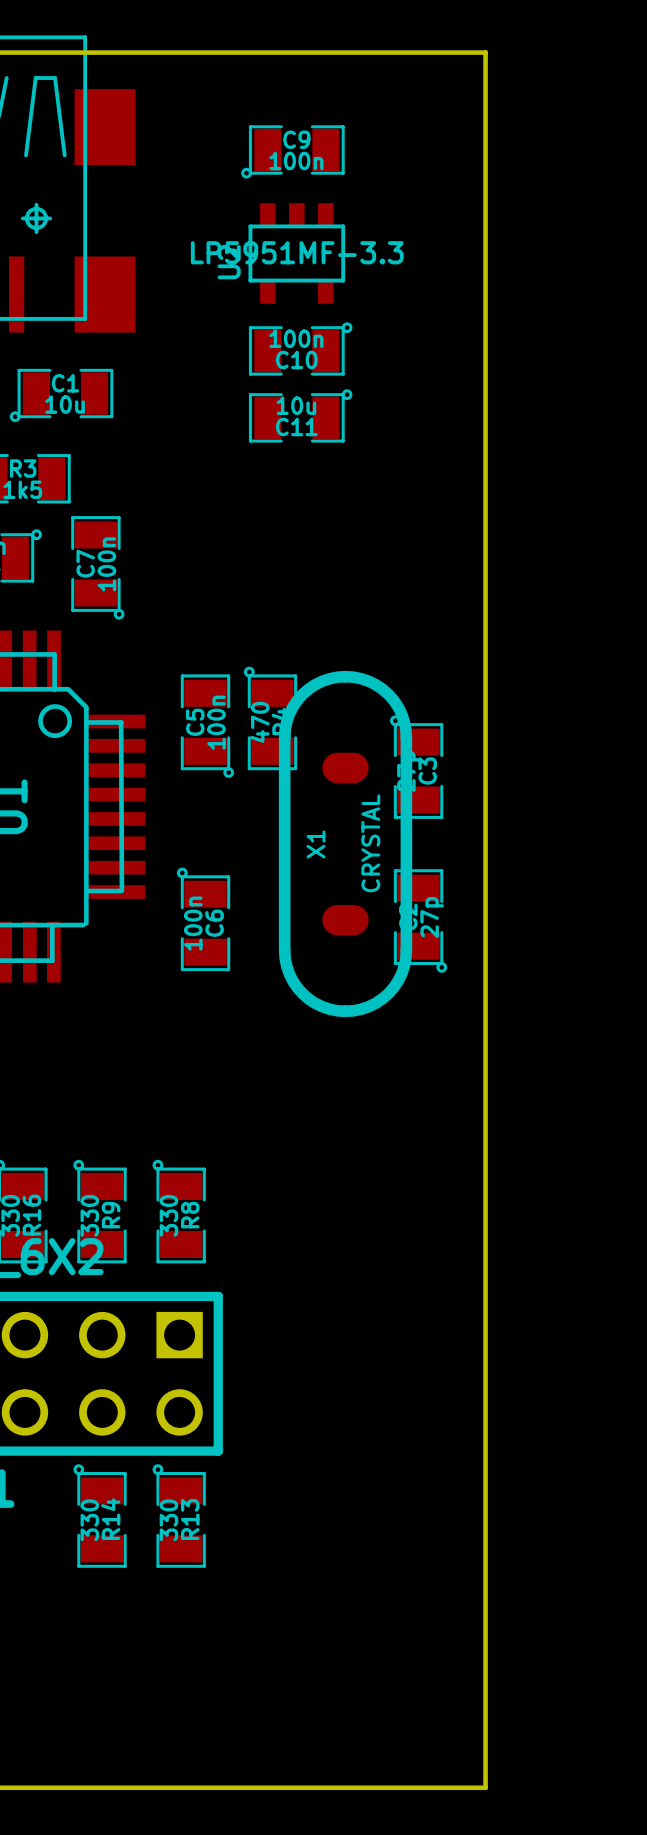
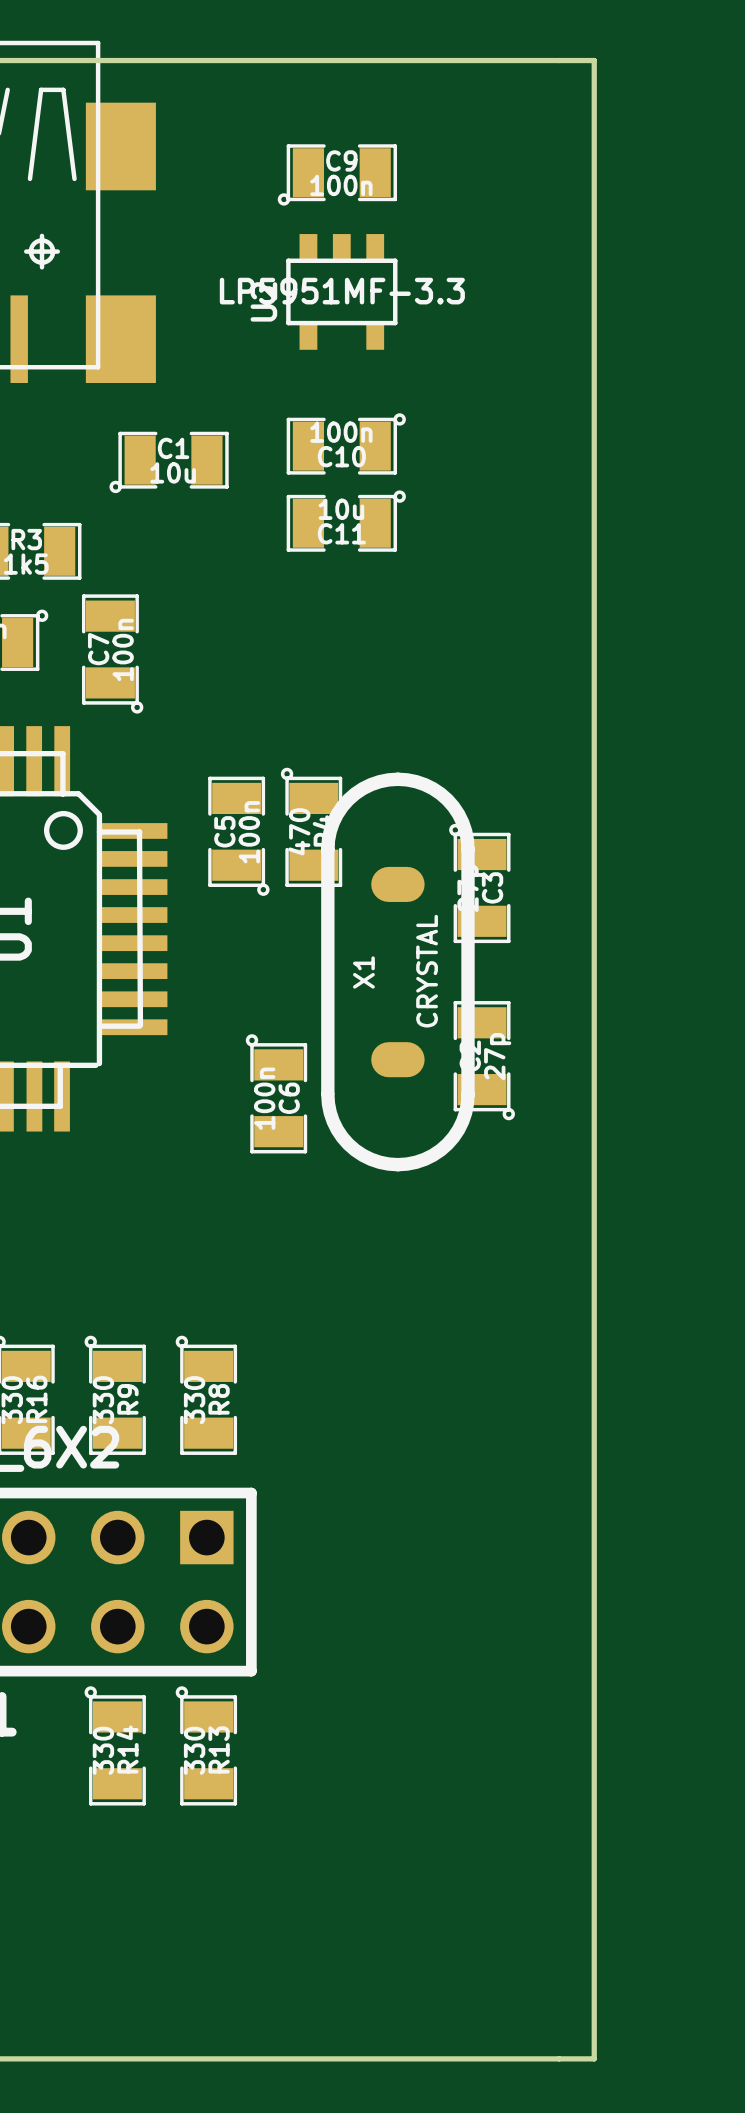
board edge: (485, 52) (485, 1787) -> (559, 60) (594, 60) (594, 2058) (559, 2058)
C10 position: (300, 348) -> (346, 443)
C1 position: (61, 395) -> (169, 462)
C11 position: (300, 415) -> (346, 521)
C6 position: (203, 919) -> (276, 1093)

